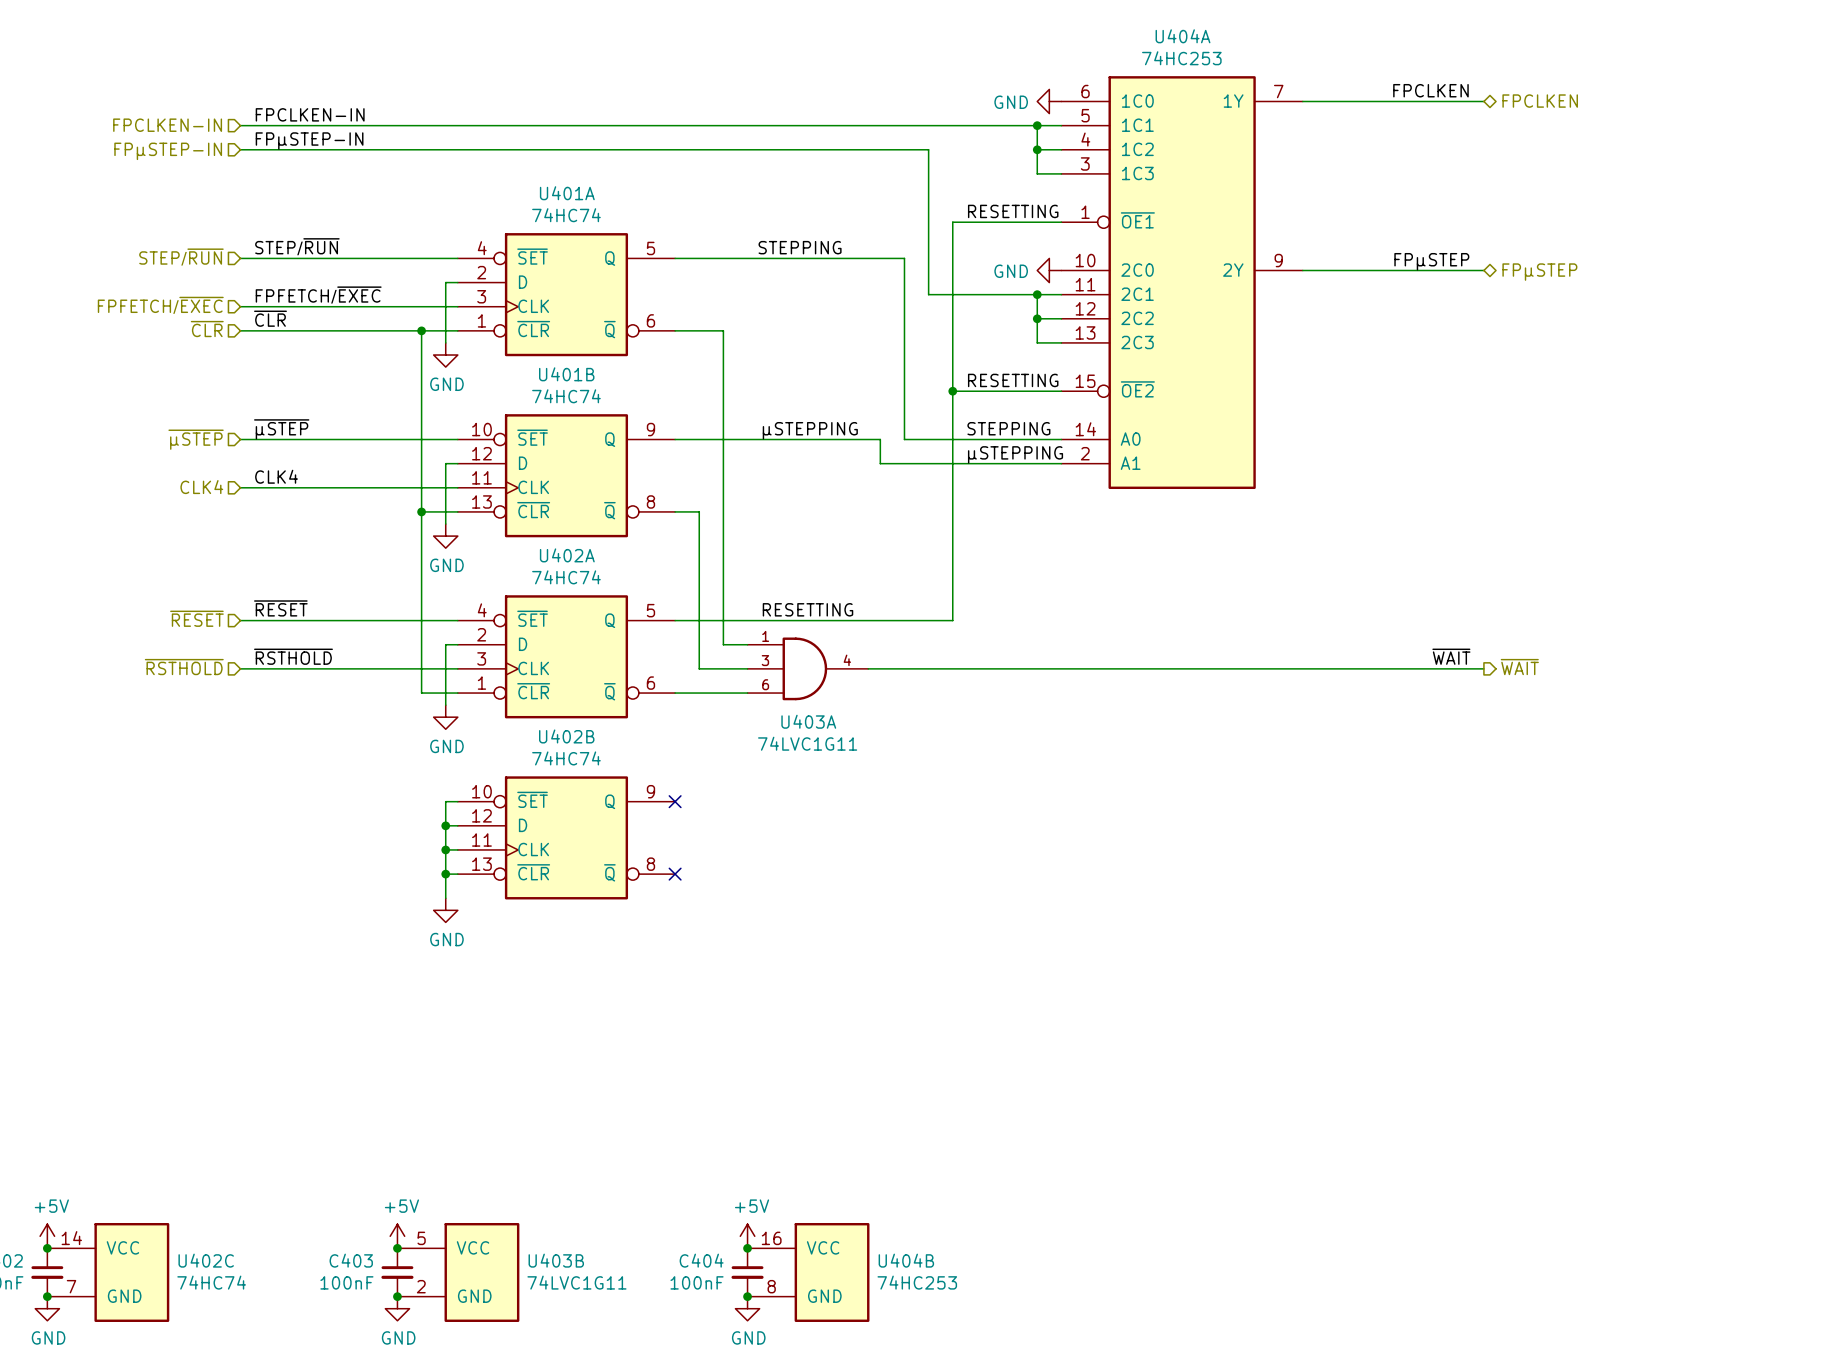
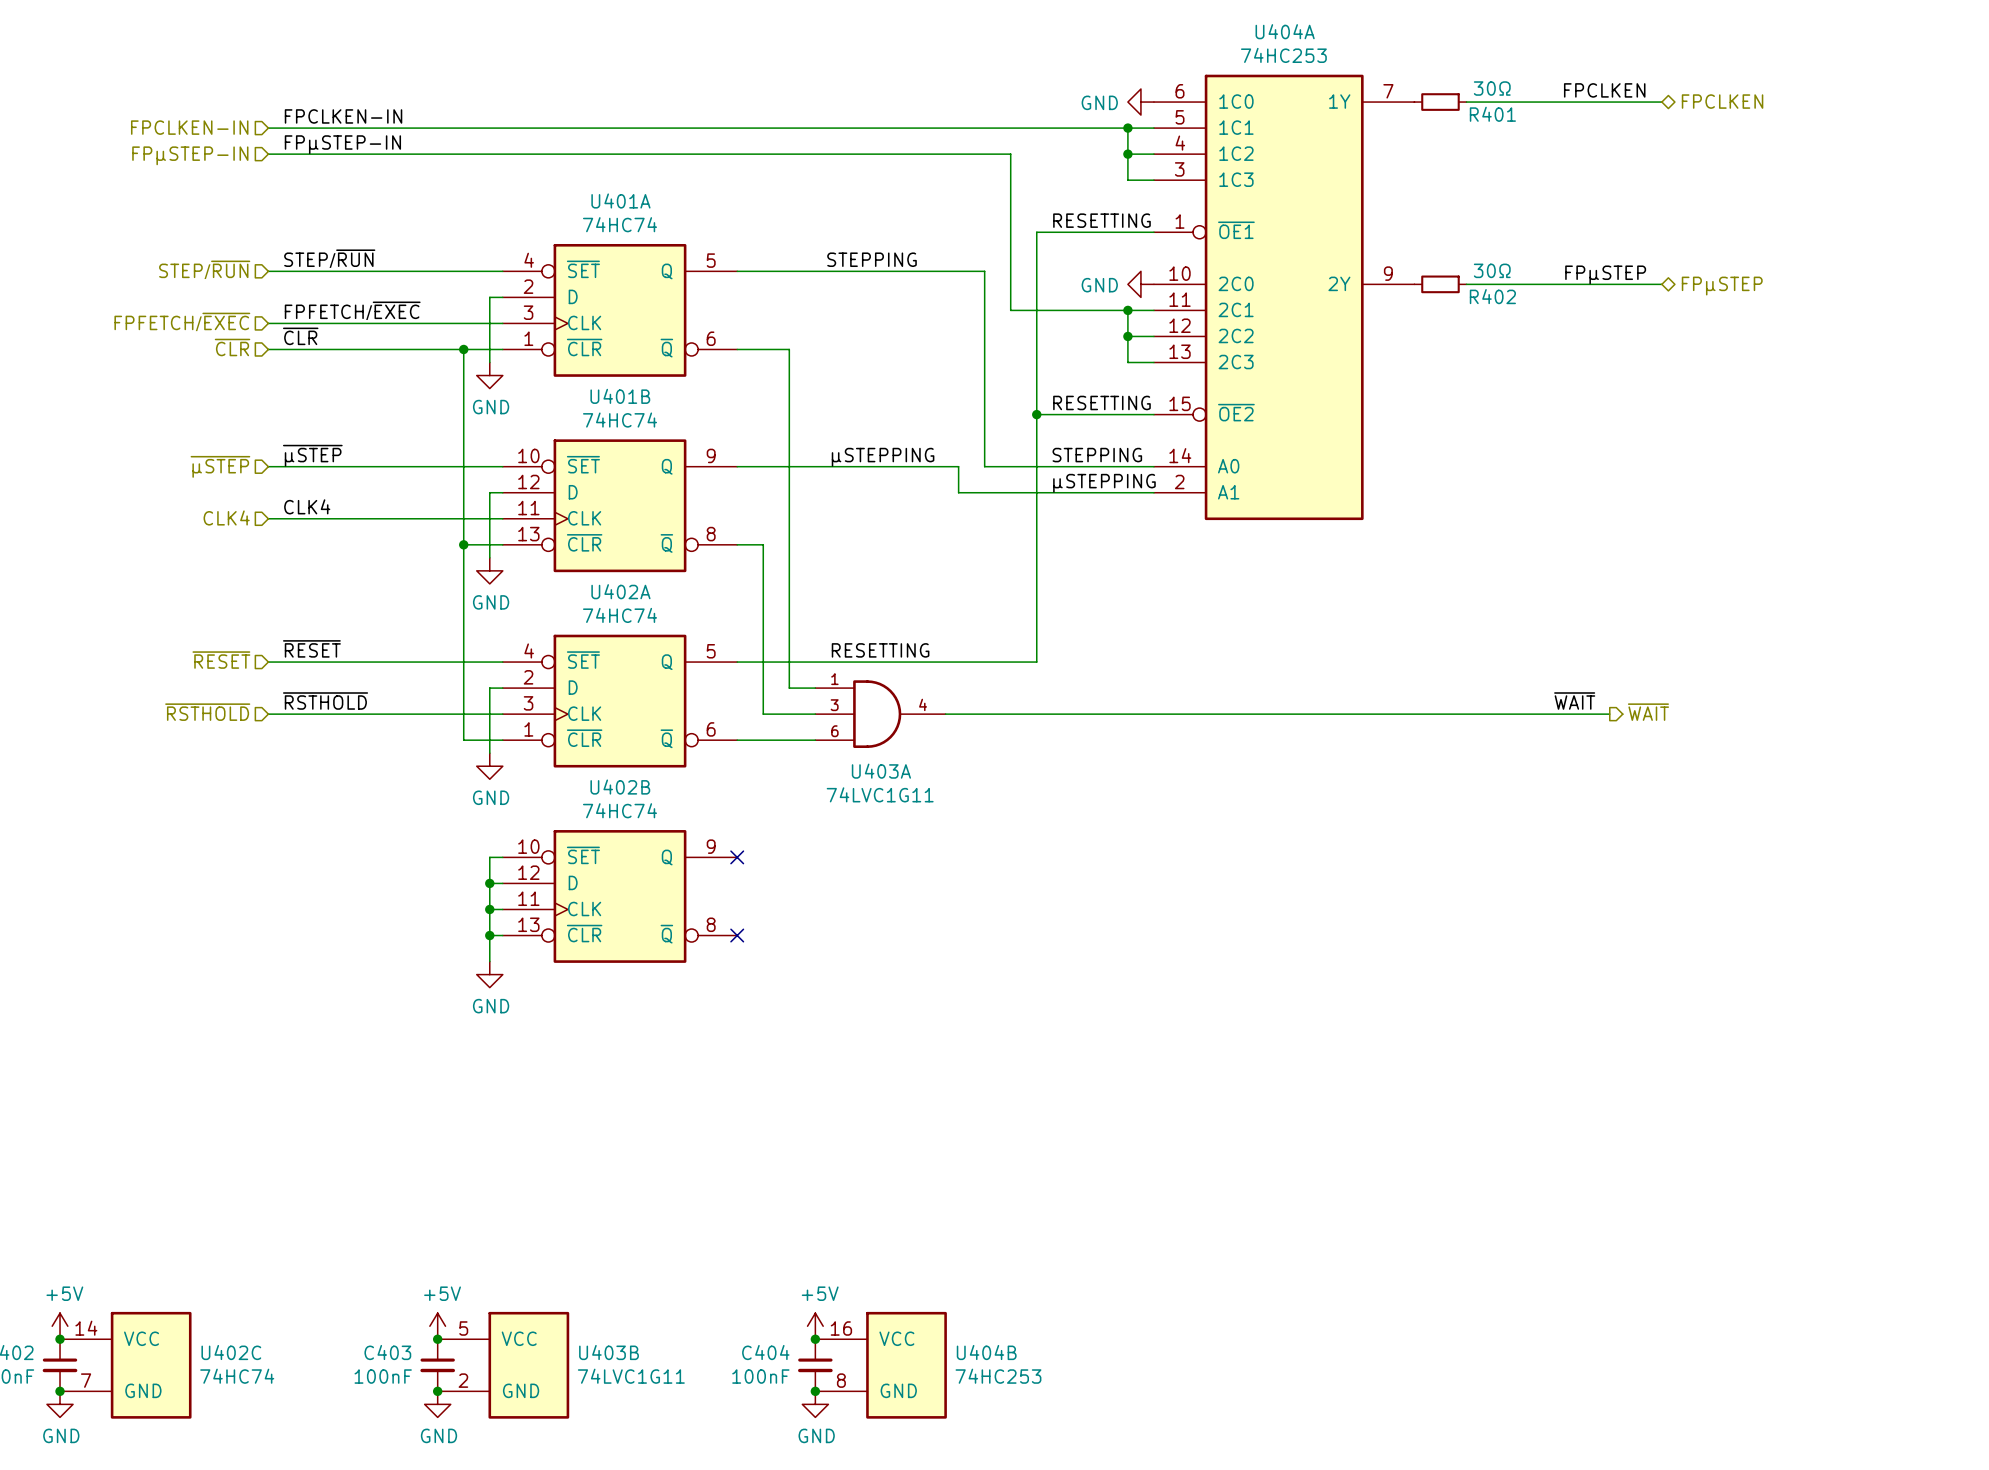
label position: FPCLKEN (1430, 90) -> FPCLKEN (1604, 90)
wire: (1302, 101) (1351, 101) -> (1609, 102) (1661, 102)
R401: none -> 30Ω (1440, 102)
hierarchical label position: FPCLKEN (1540, 101) -> FPCLKEN (1722, 101)
label position: FPµSTEP (1431, 261) -> FPµSTEP (1605, 274)
wire: (1302, 270) (1351, 270) -> (1609, 284) (1661, 284)
R402: none -> 30Ω (1440, 284)
hierarchical label position: FPµSTEP (1539, 272) -> FPµSTEP (1722, 286)

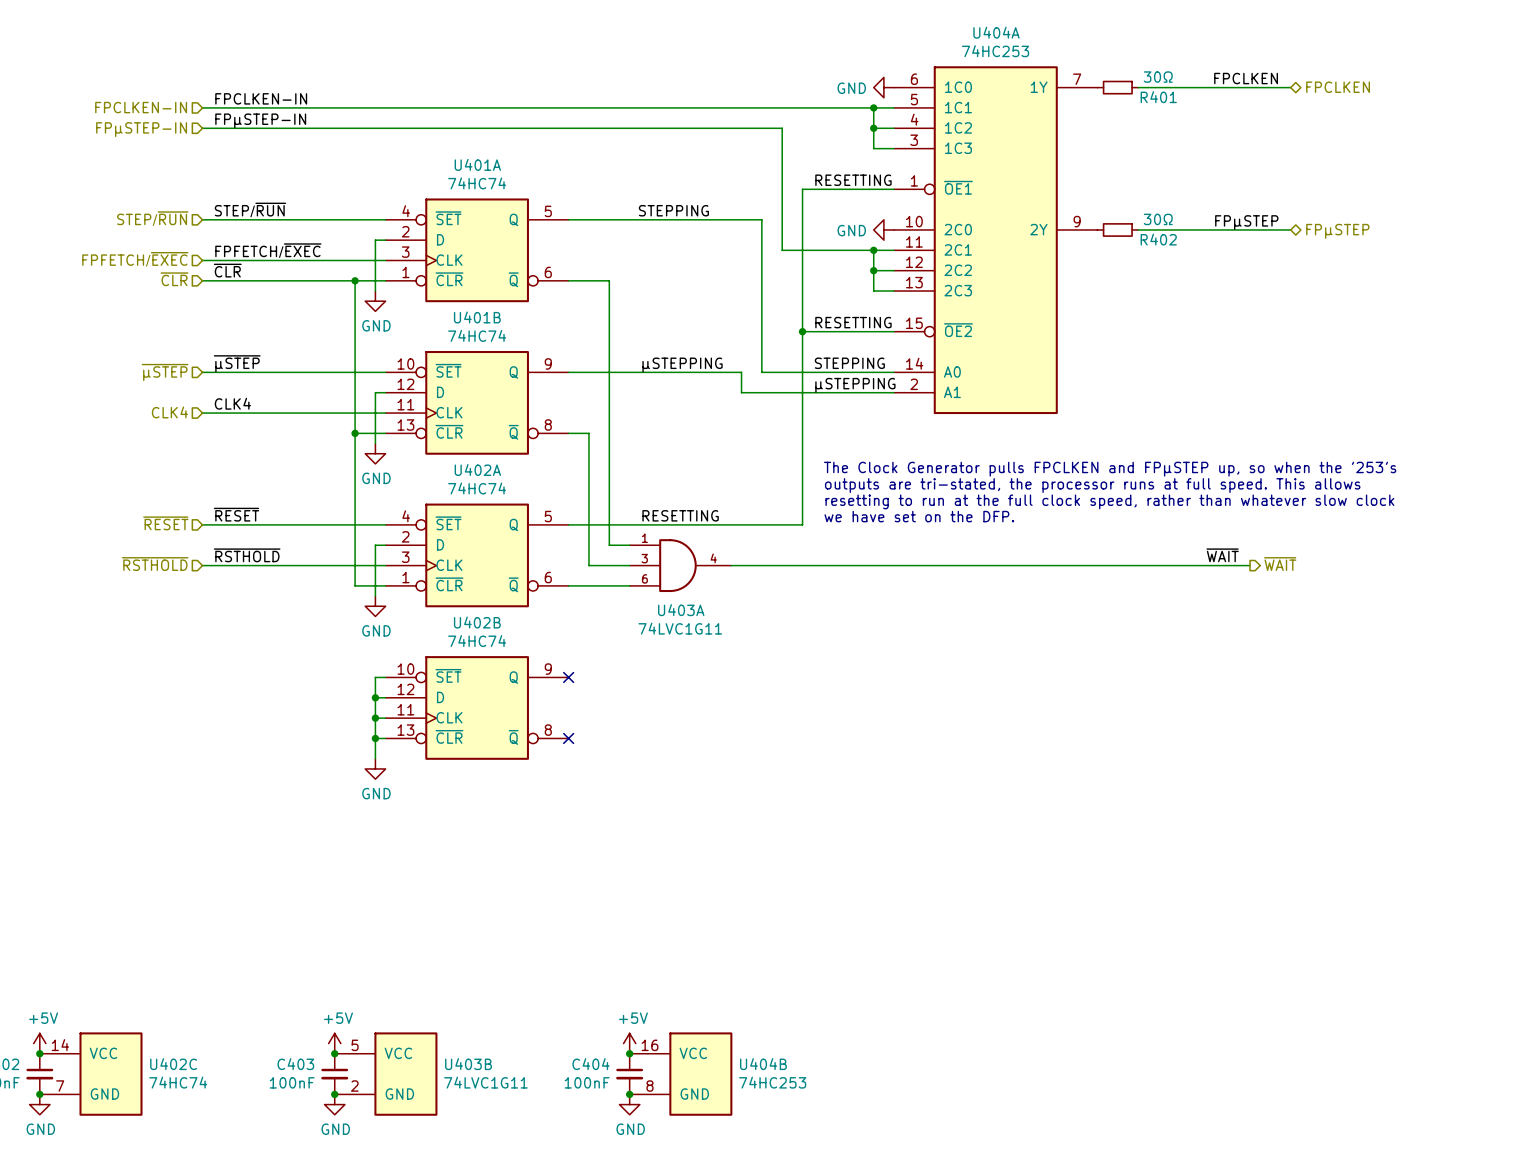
text: none -> The Clock Generator pulls FPCLKEN and FPµSTEP up, so when the '253's (1110, 469)
text: none -> outputs are tri-stated, the processor runs at full speed. This allows (1092, 485)
text: none -> resetting to run at the full clock speed, rather than whatever slow clock (1109, 501)
text: none -> we have set on the DFP. (919, 516)

